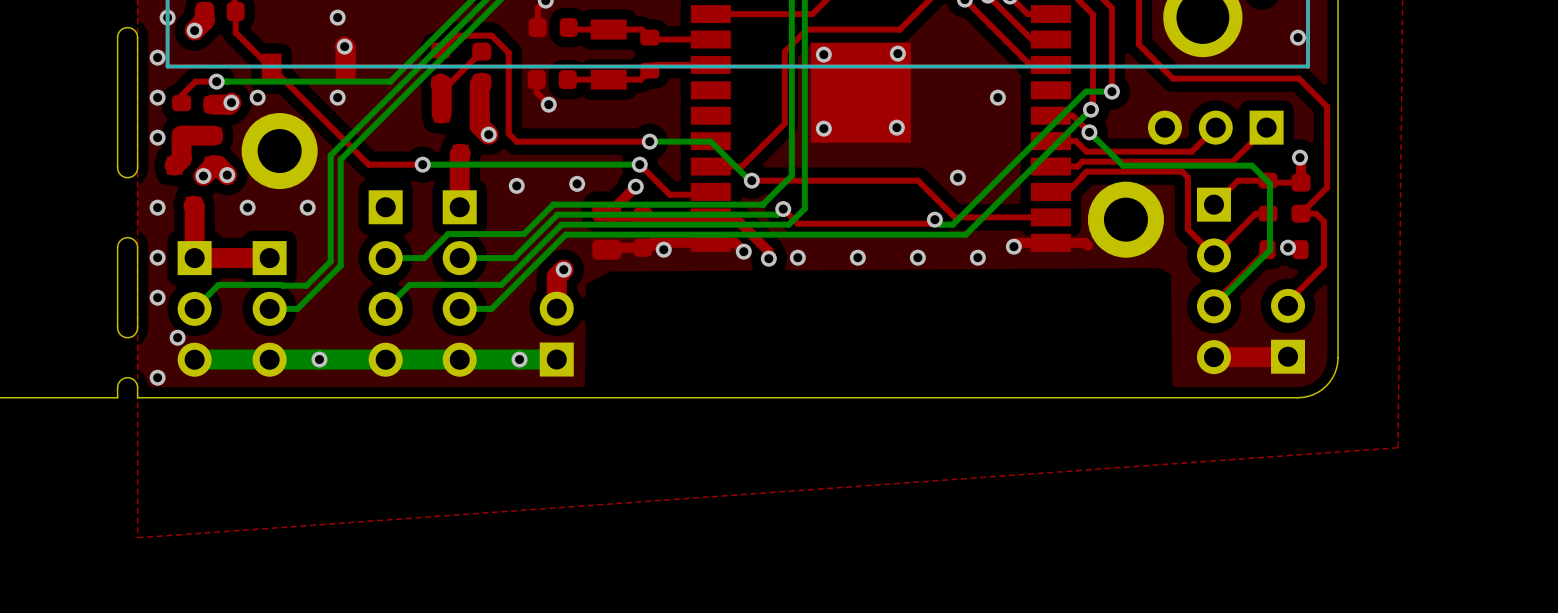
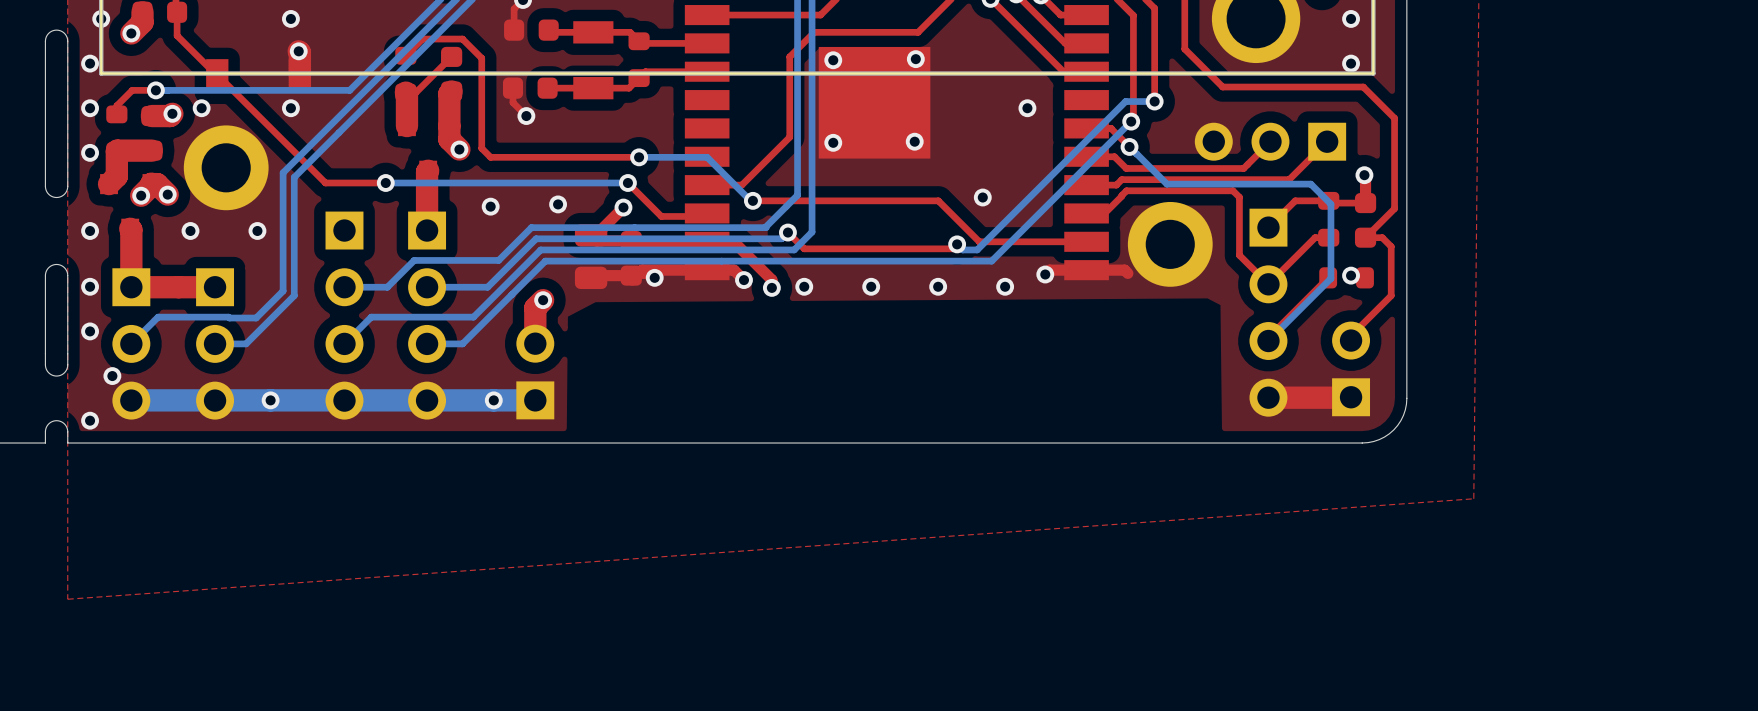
via: none -> (1351, 18)
via: (1298, 37) -> none
via: none -> (1351, 63)

